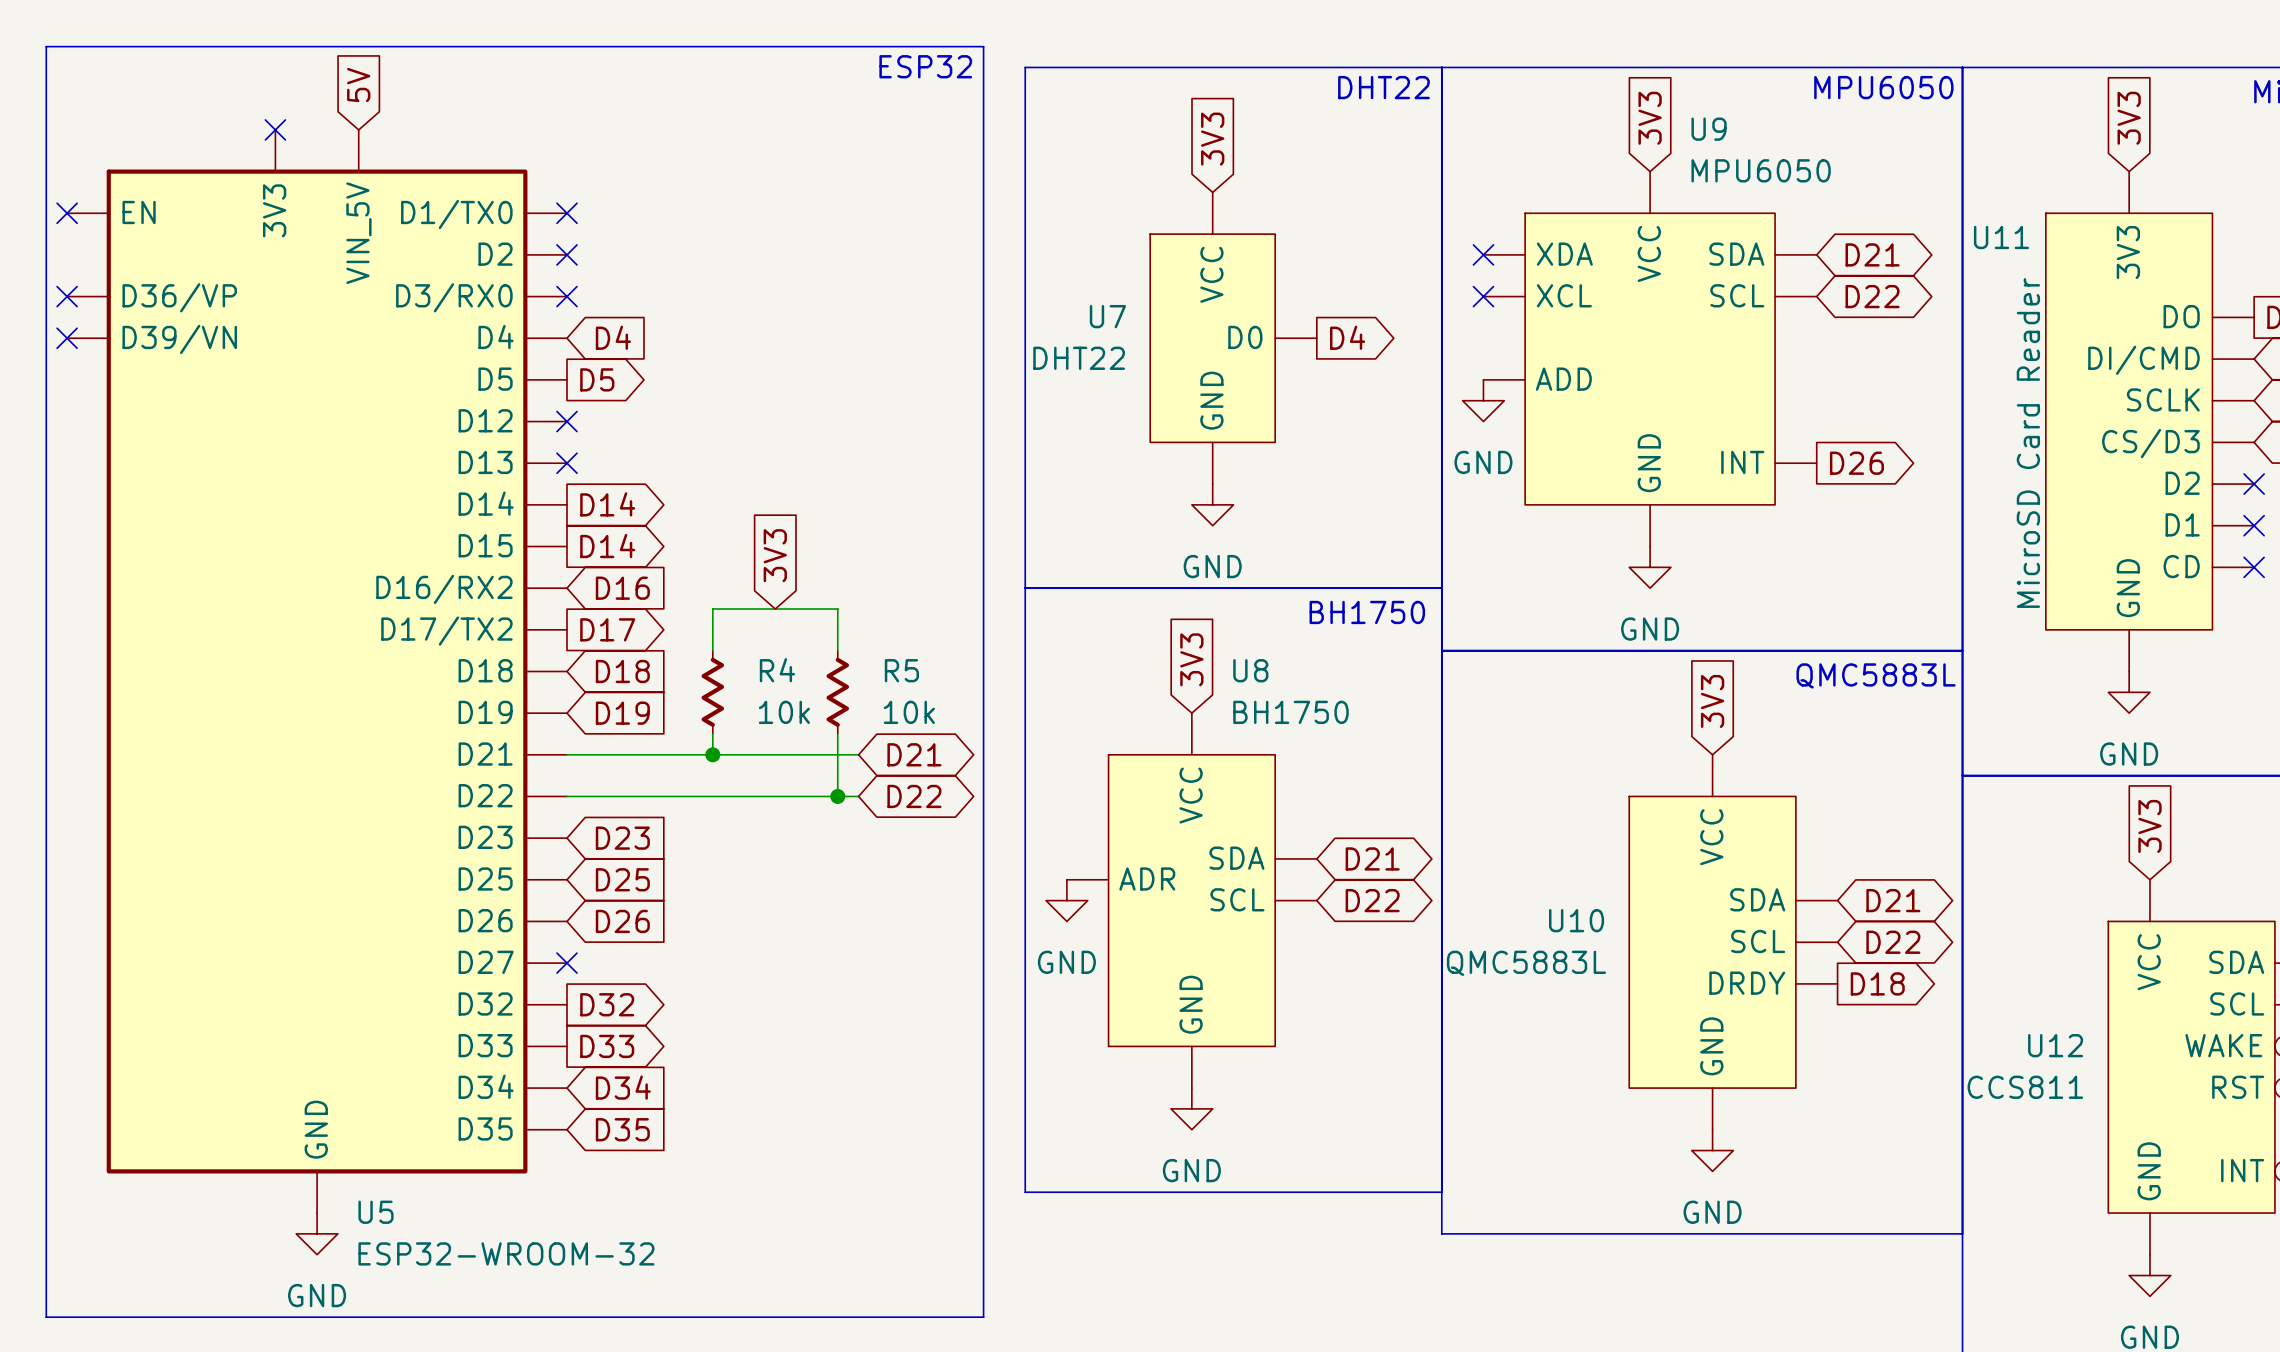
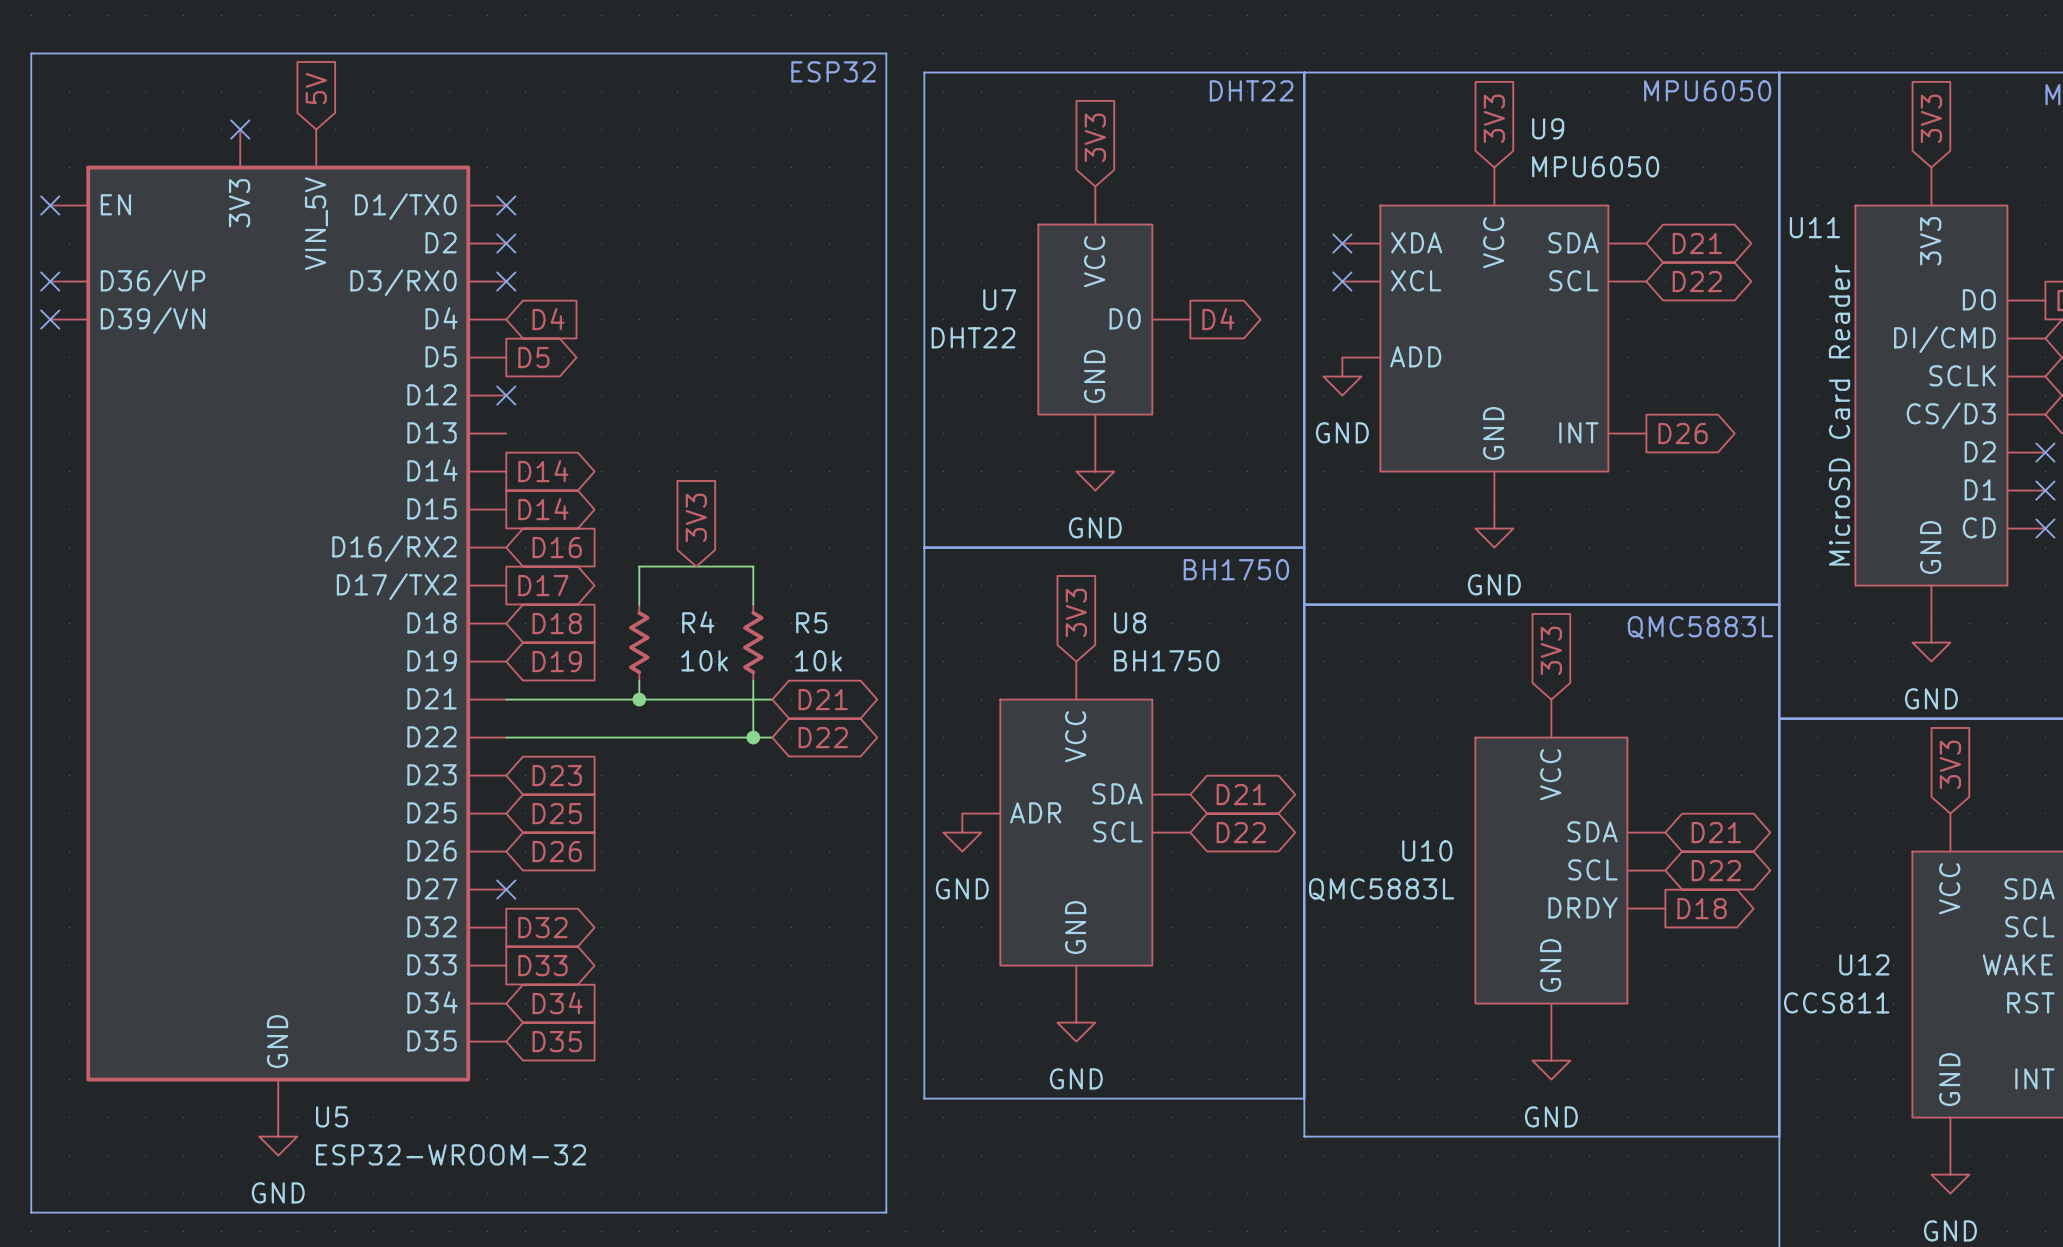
no-connect mark: (567, 463) -> none

